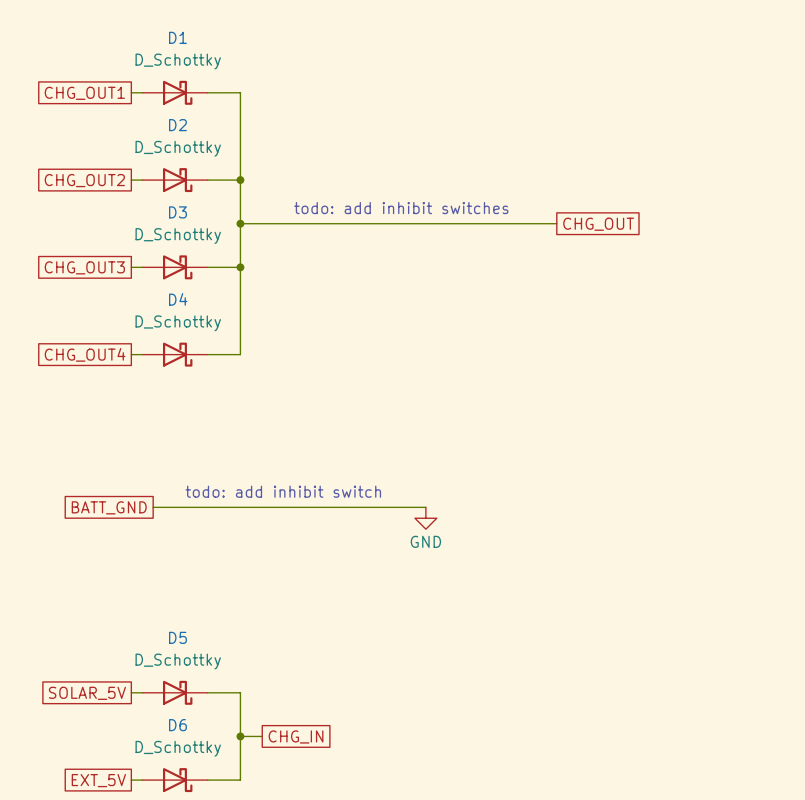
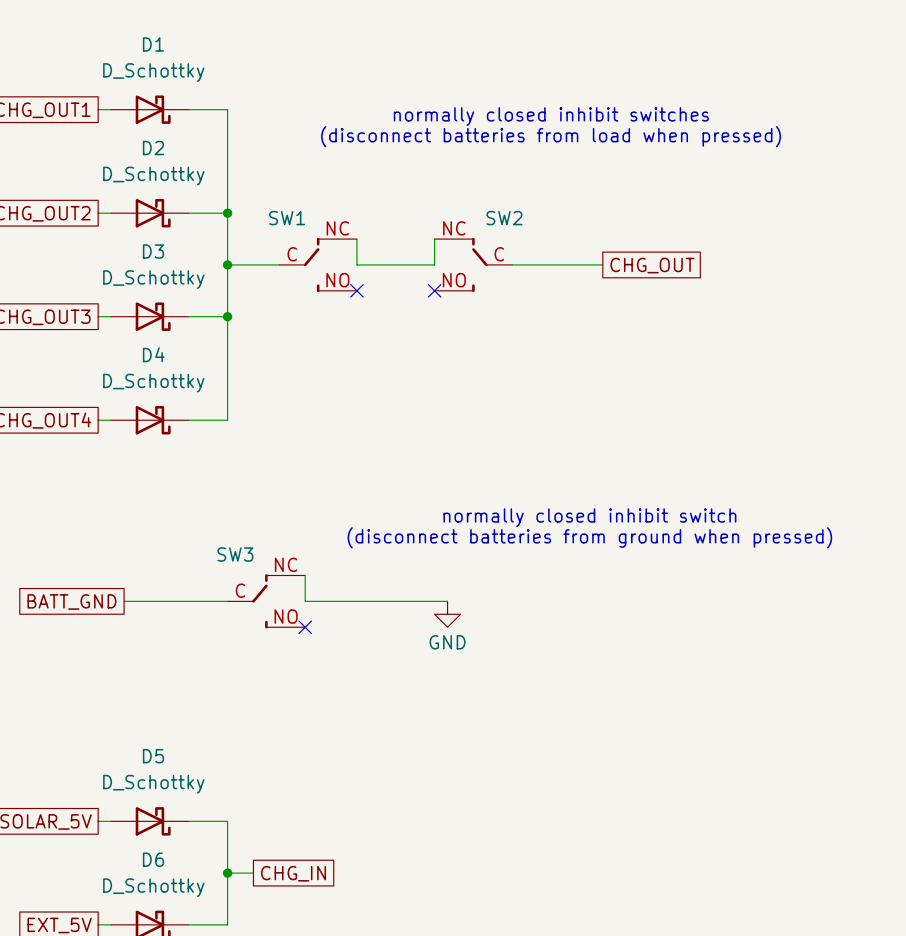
text: none -> normally closed inhibit switches (551, 116)
text: none -> (disconnect batteries from load when pressed) (551, 136)
text: todo: add inhibit switches (401, 208) -> none
wire: (284, 223) (349, 223) -> (356, 239) (356, 264)
SW1: none -> (318, 264)
wire: (414, 223) (480, 223) -> (434, 264) (434, 239)
SW2: none -> (473, 264)
no-connect mark: none -> (356, 290)
no-connect mark: none -> (434, 290)
text: none -> normally closed inhibit switch (589, 517)
text: none -> (disconnect batteries from ground when pressed) (589, 537)
text: todo: add inhibit switch (283, 491) -> none
wire: (240, 507) (305, 507) -> (305, 575) (305, 601)
SW3: none -> (266, 601)
no-connect mark: none -> (305, 627)

